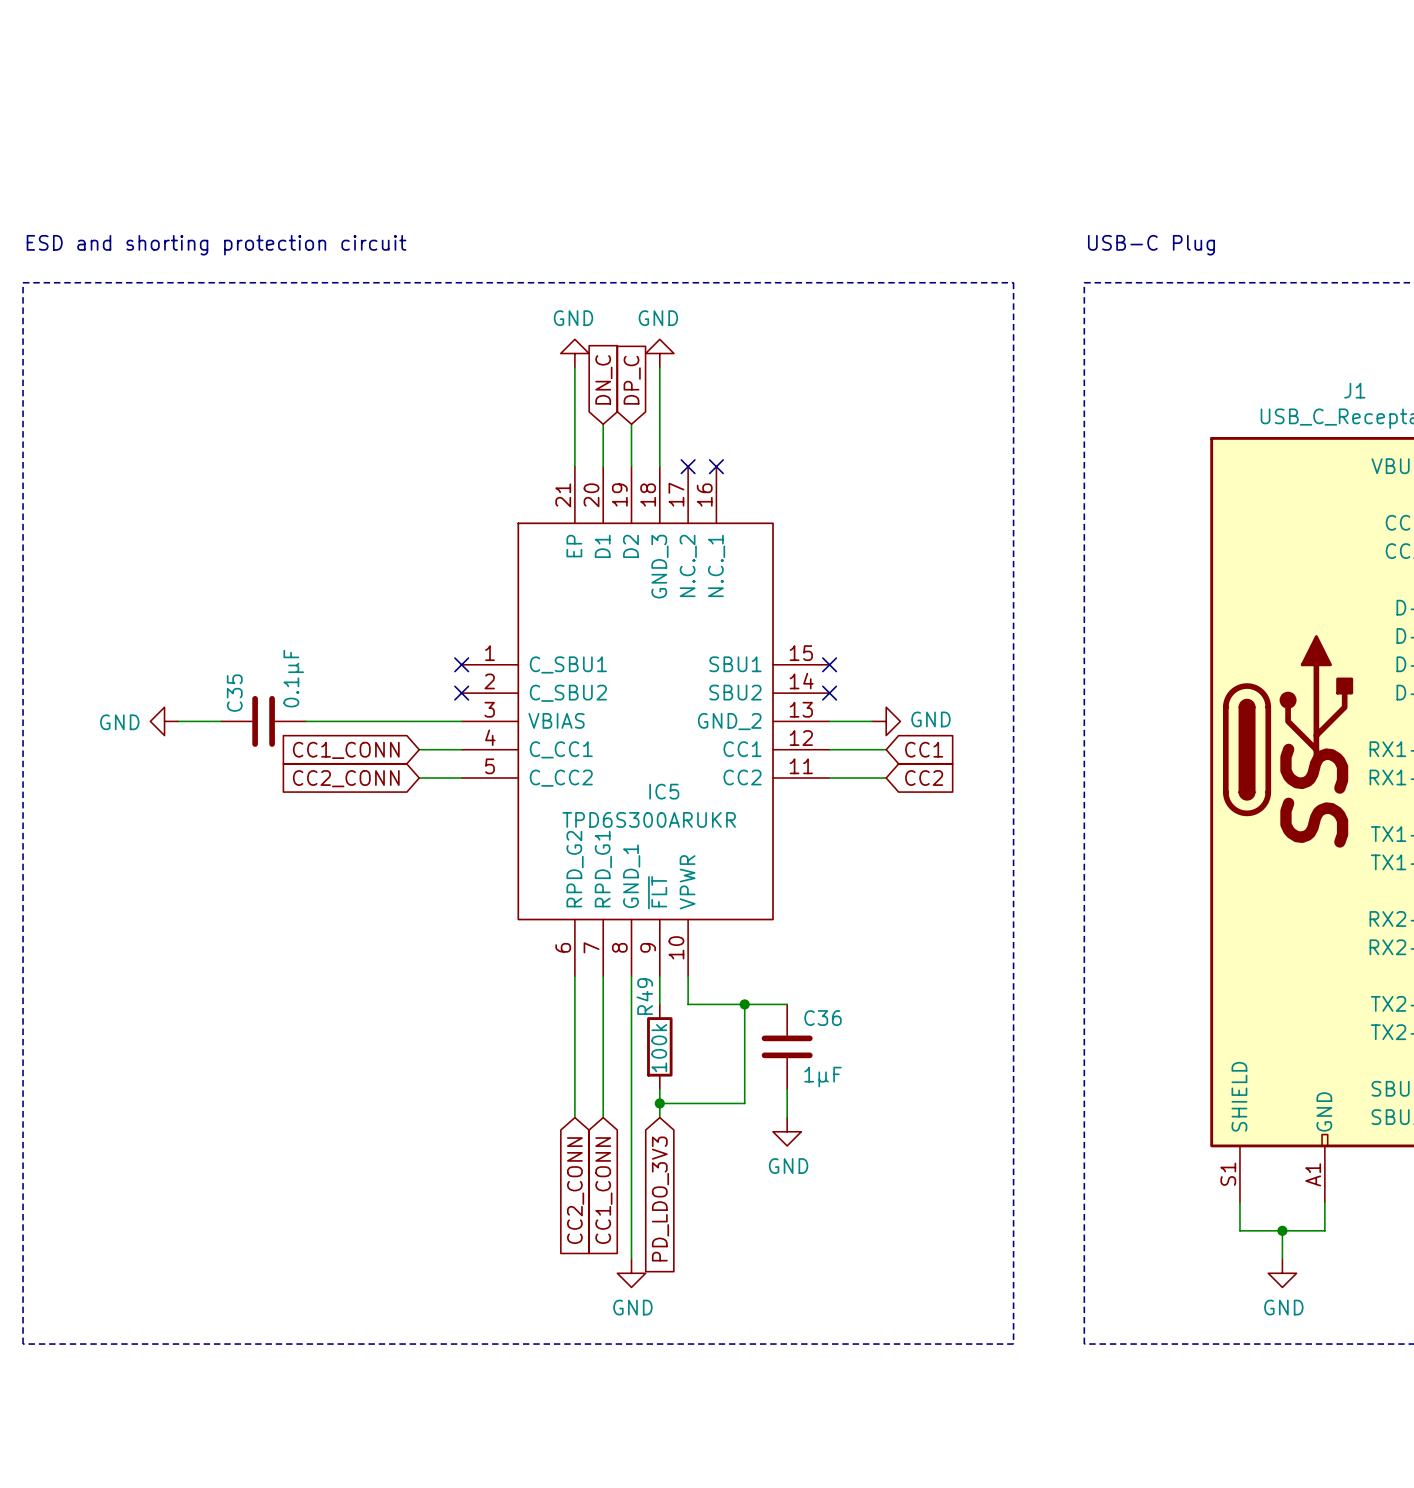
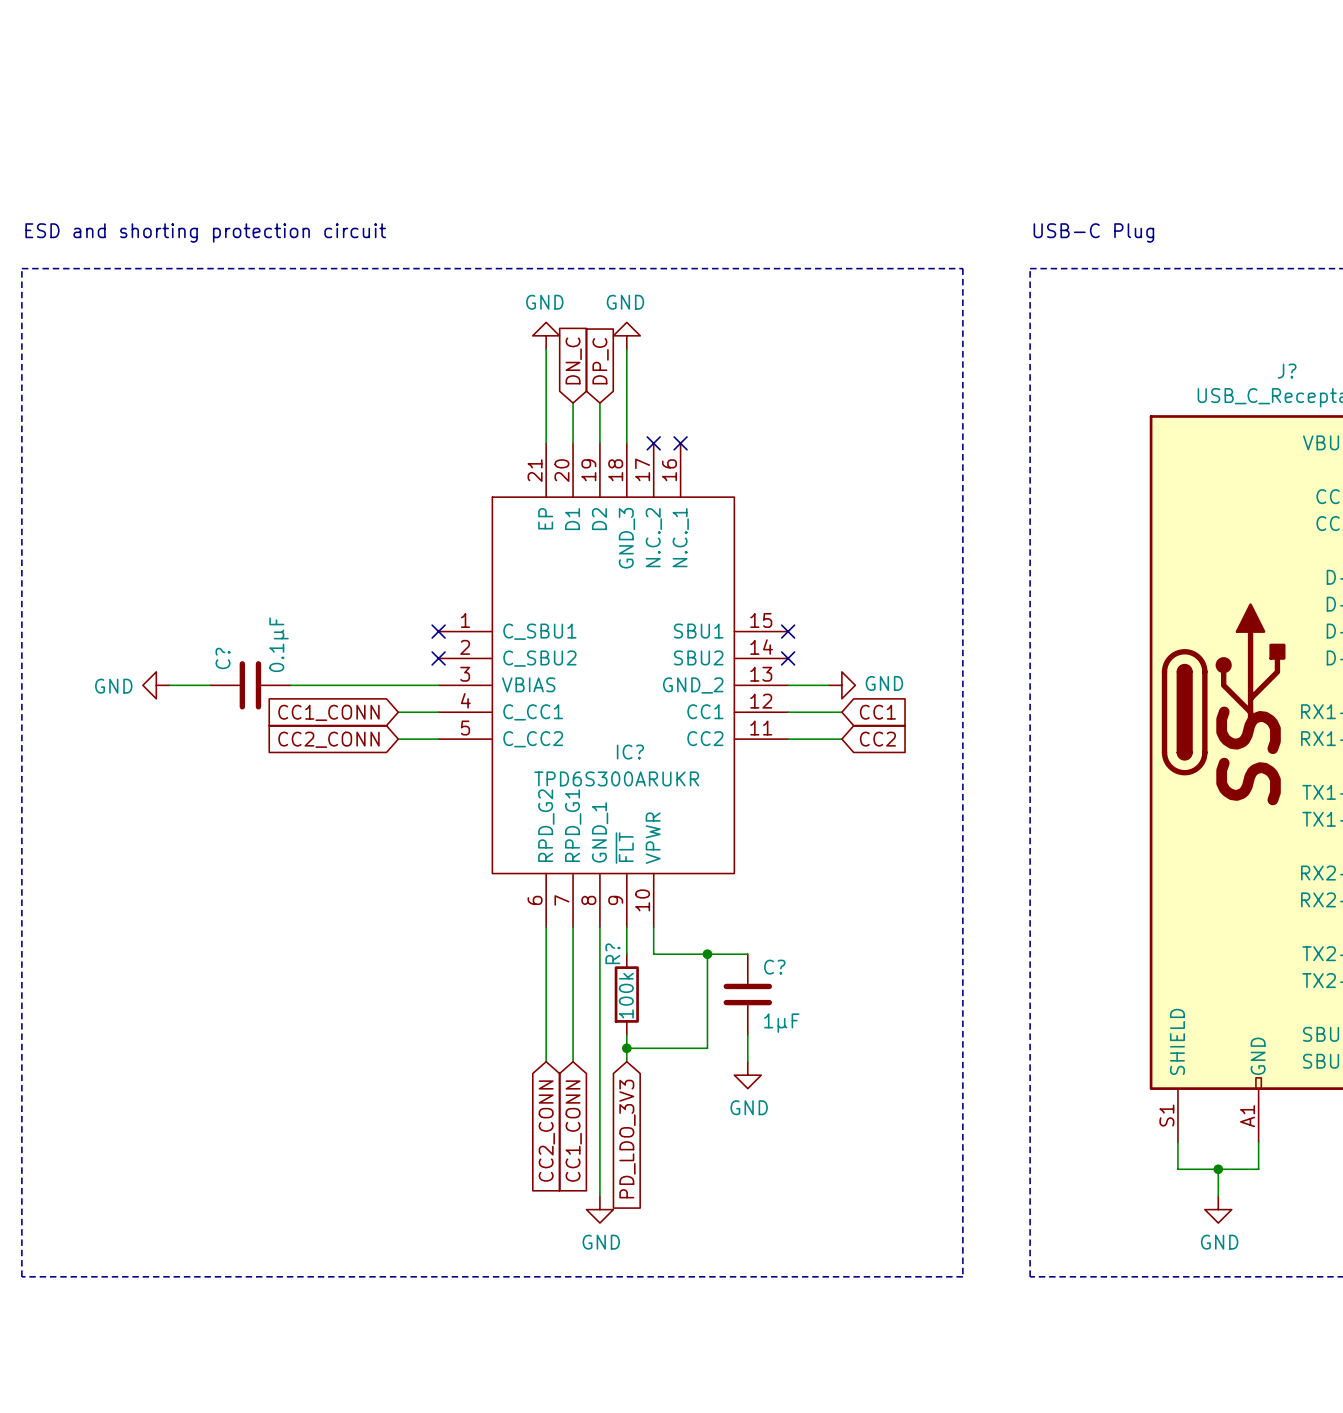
J1 name: J1 (1354, 390) -> J? (1287, 371)
C35 name: C35 (234, 693) -> C? (223, 658)
IC5 name: IC5 (664, 791) -> IC? (630, 752)
R49 name: R49 (644, 996) -> R? (612, 953)
C36 name: C36 (822, 1018) -> C? (774, 967)

